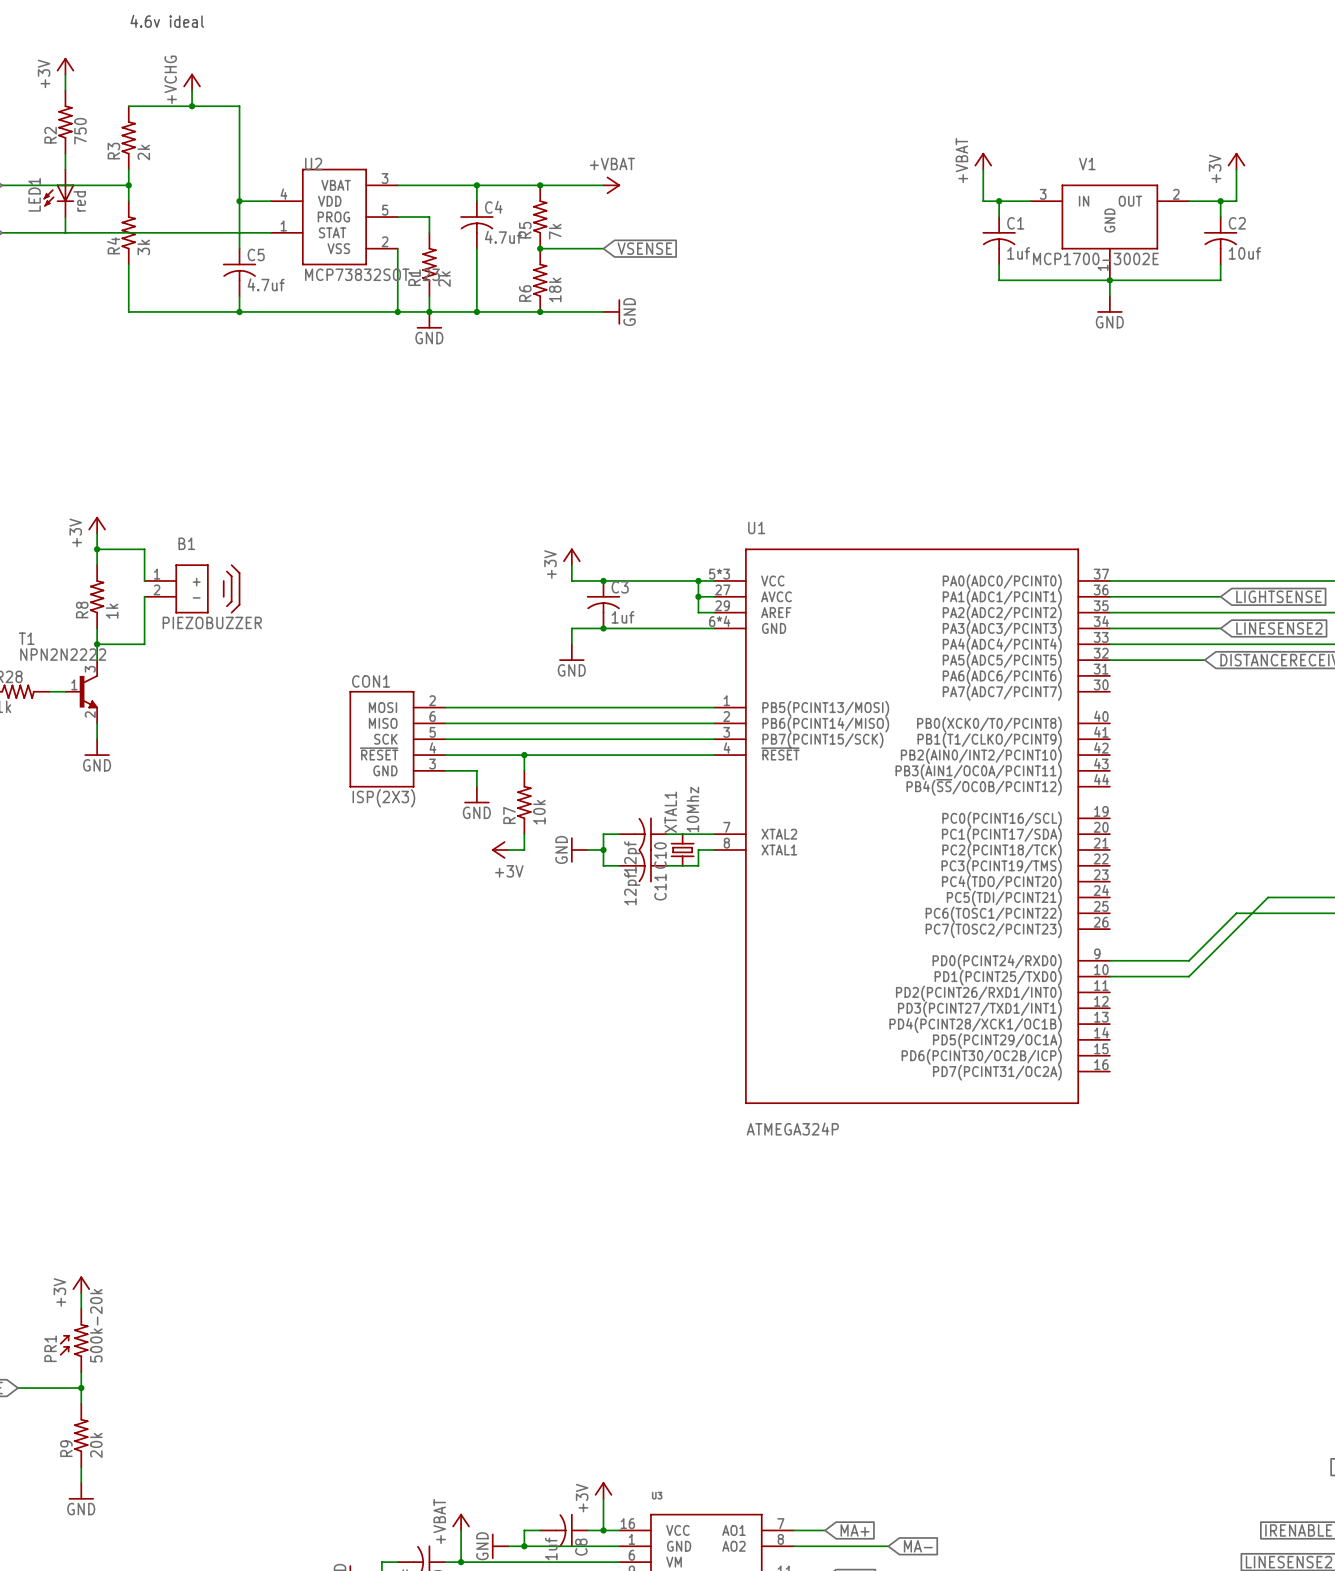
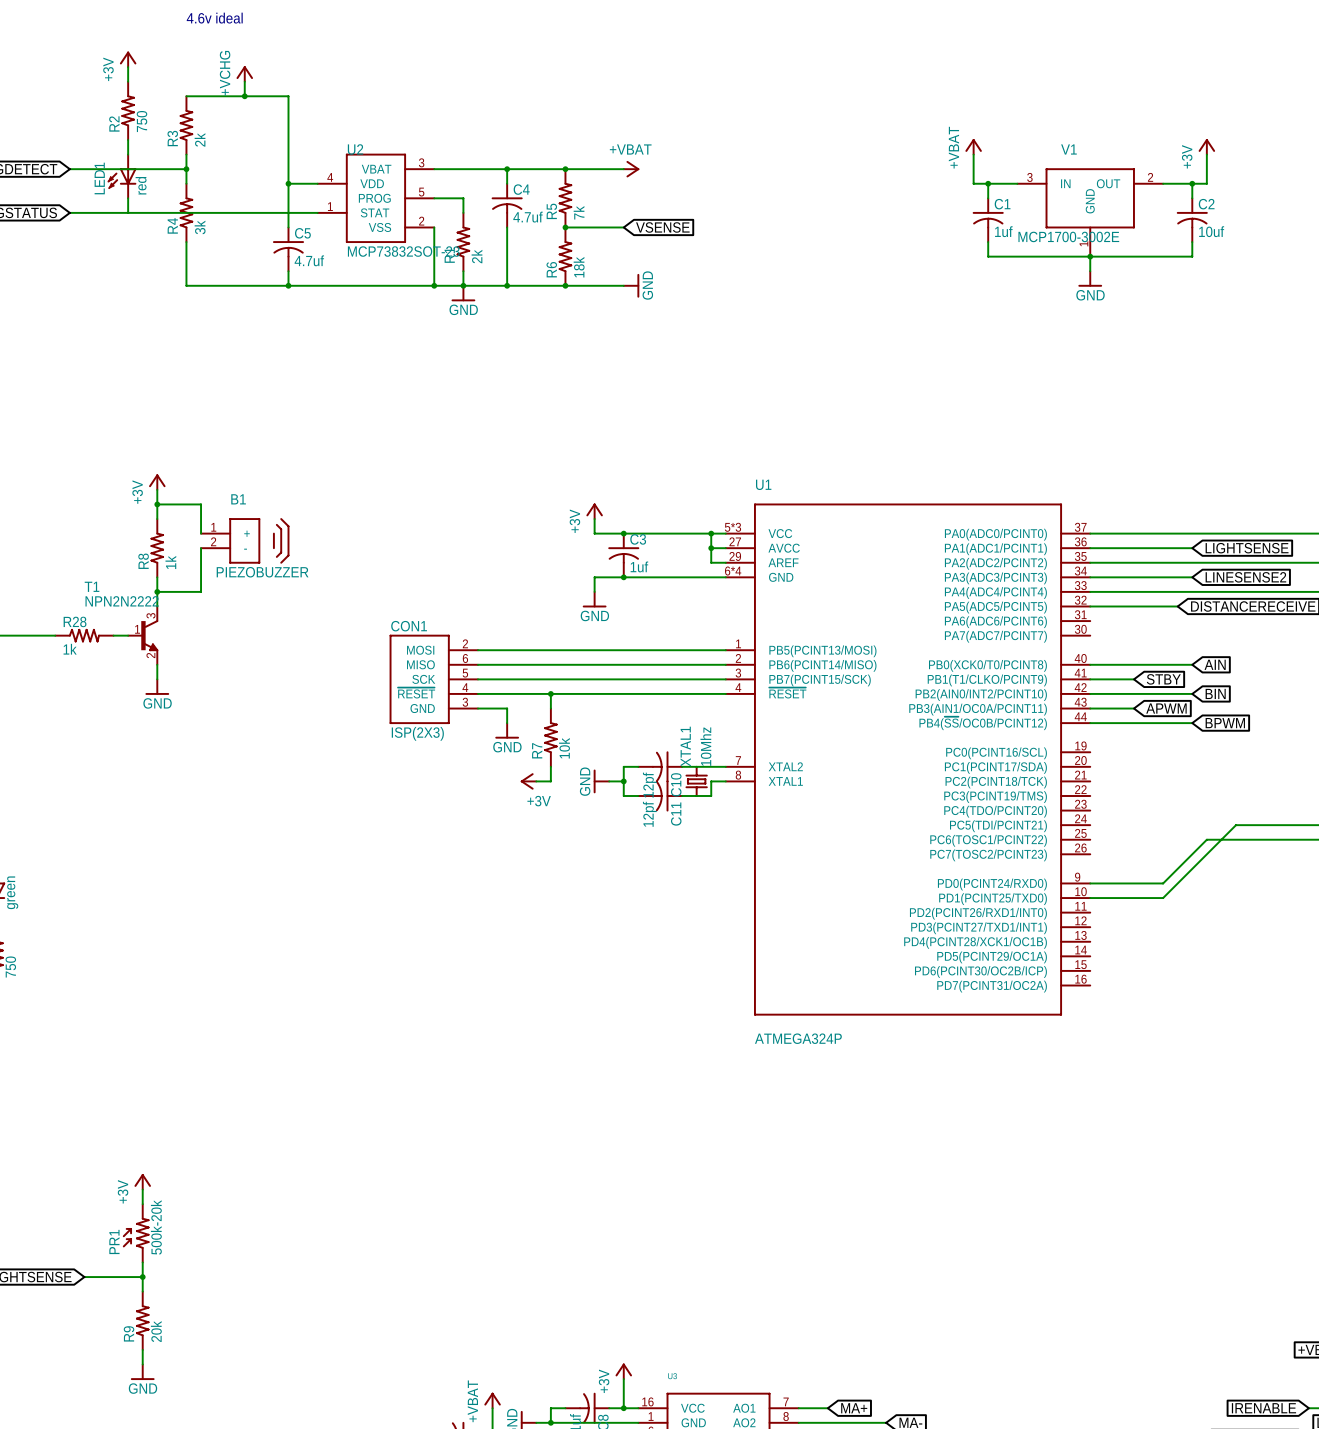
wire: none -> (1090, 664) (1192, 664)
global label: none -> AIN (1215, 664)
wire: none -> (1090, 679) (1133, 679)
global label: none -> STBY (1163, 679)
wire: none -> (1090, 693) (1192, 693)
global label: none -> BIN (1215, 693)
wire: none -> (1090, 708) (1133, 708)
global label: none -> APWM (1166, 708)
wire: none -> (1090, 723) (1192, 723)
global label: none -> BPWM (1225, 723)

